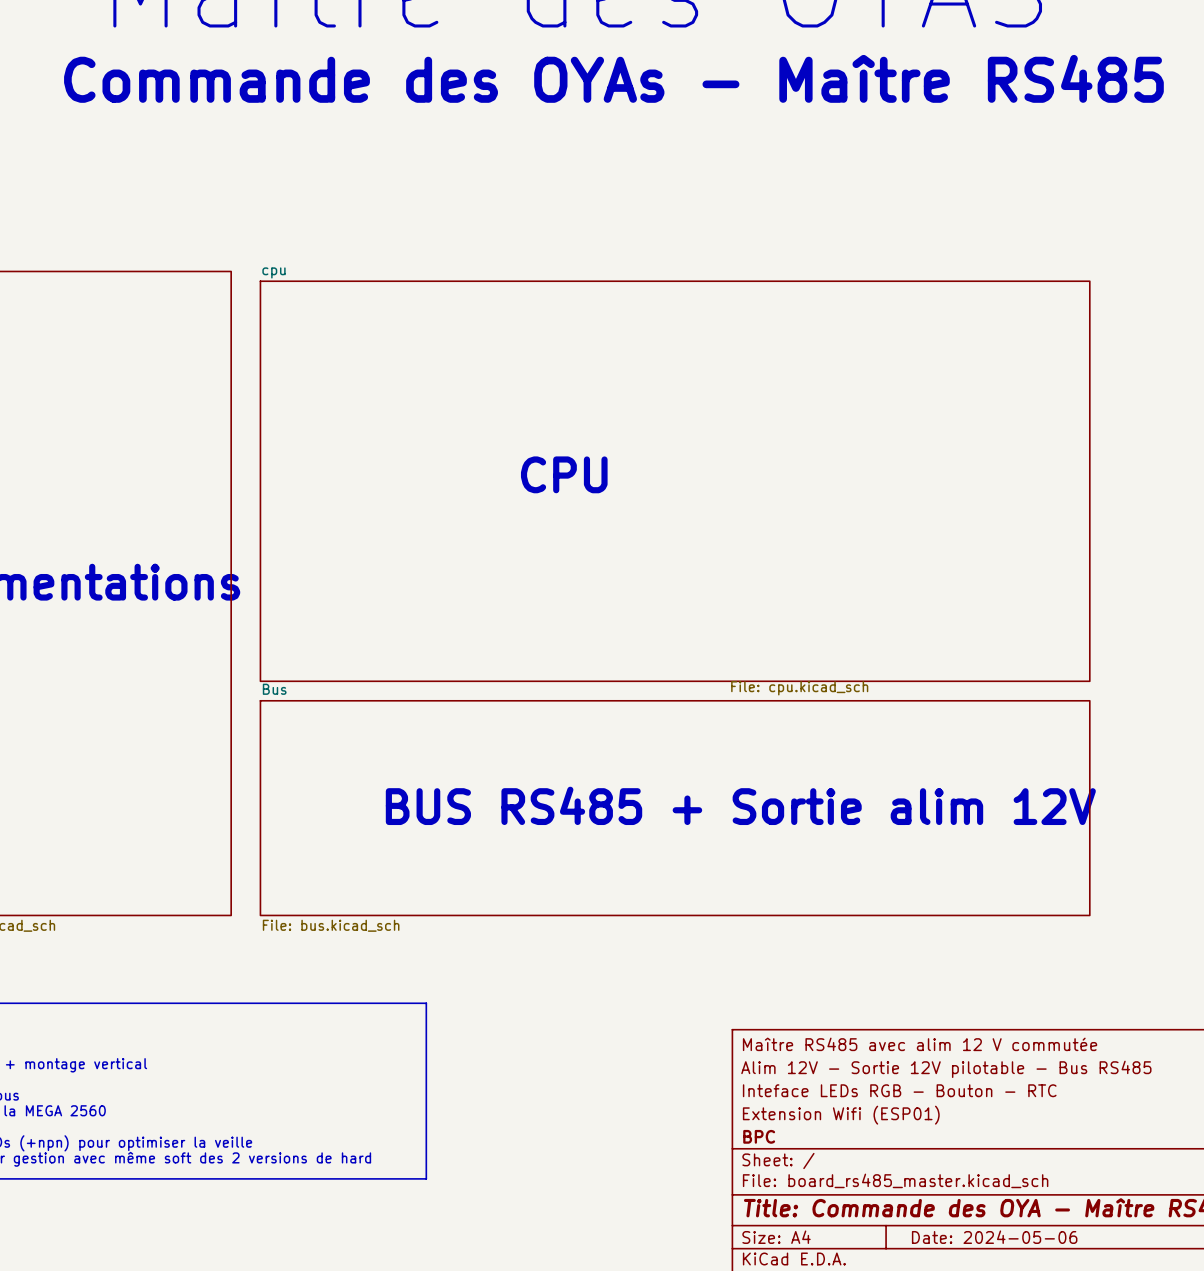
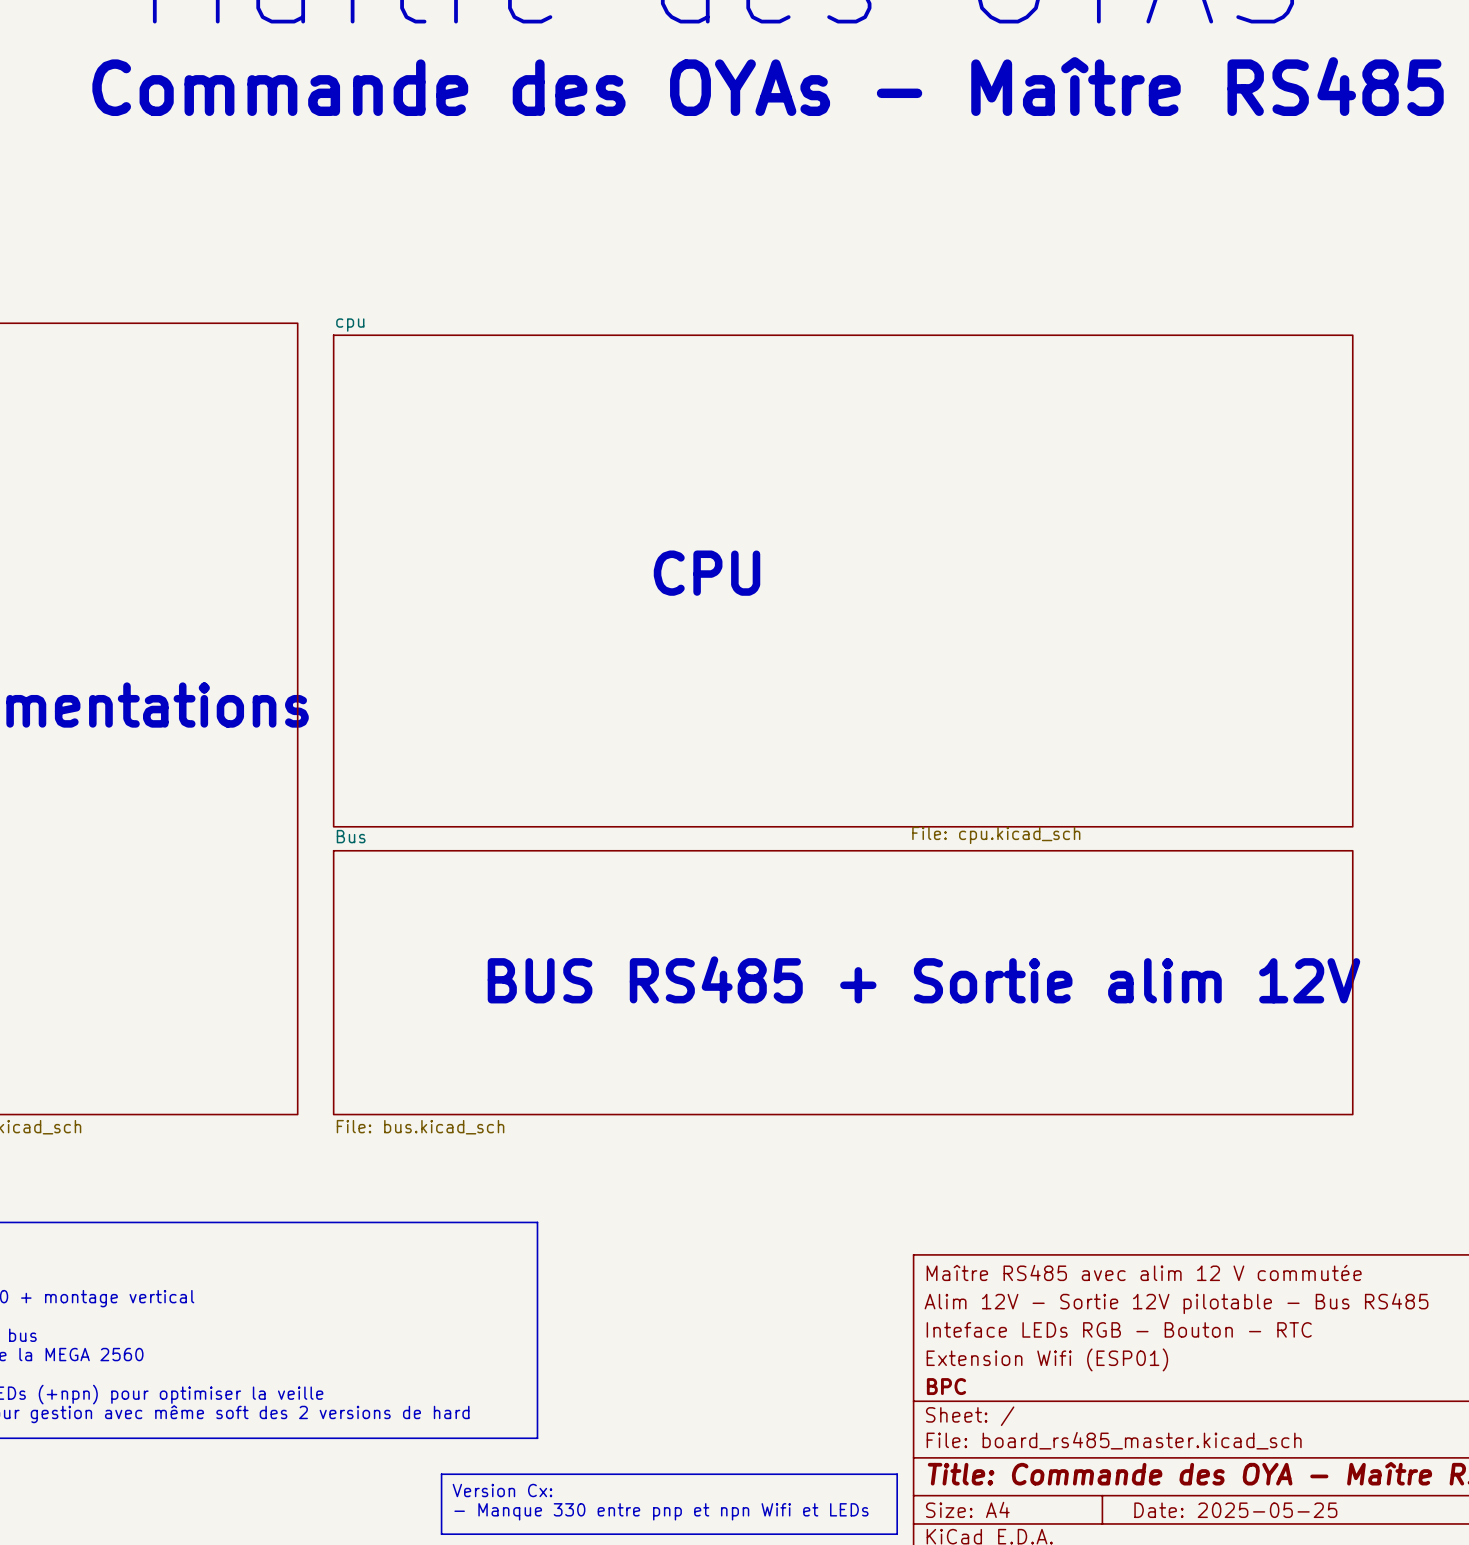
line: none -> (441, 1474) (897, 1474) (897, 1534) (441, 1534) (441, 1474)
text: none -> Version Cx: (502, 1490)
title block: Date: 2024-05-06 (994, 1237) -> Date: 2025-05-25 (1235, 1510)
text: none -> - Manque 330 entre pnp et npn Wifi et LEDs (661, 1511)

